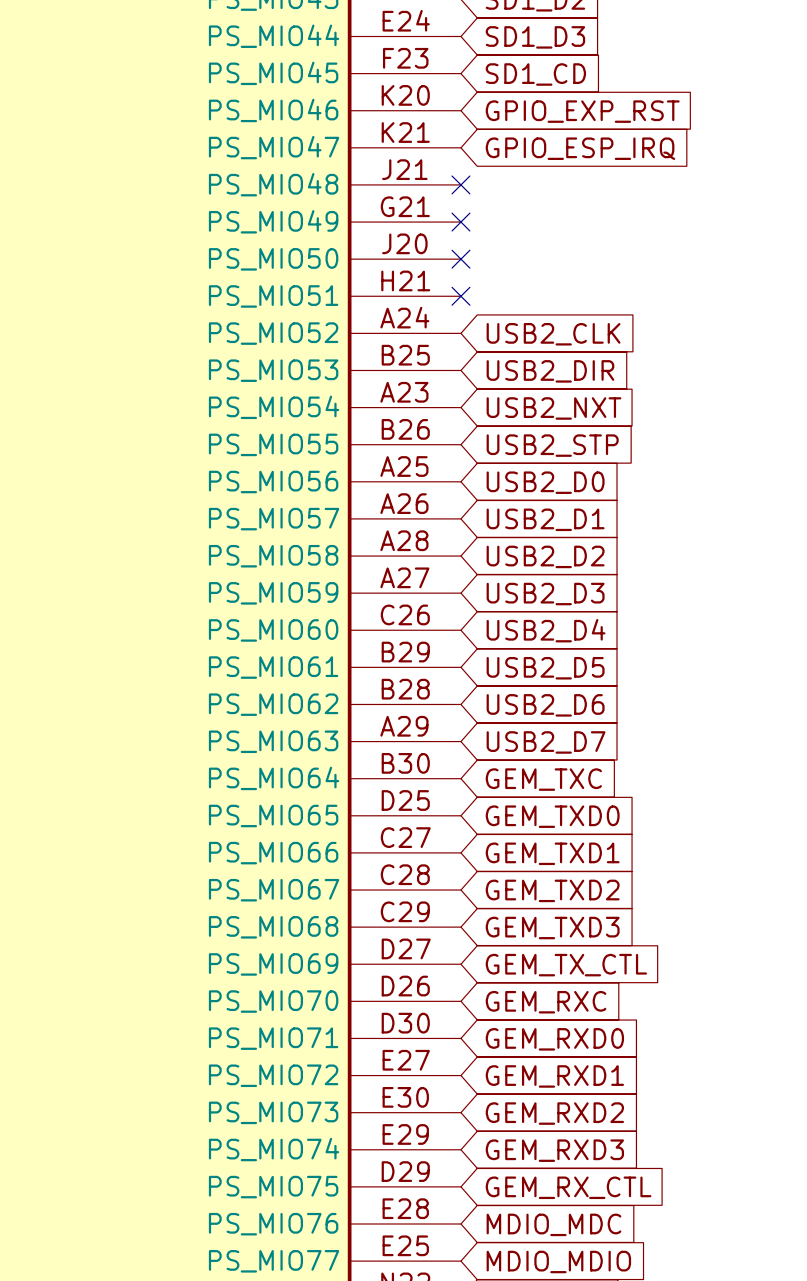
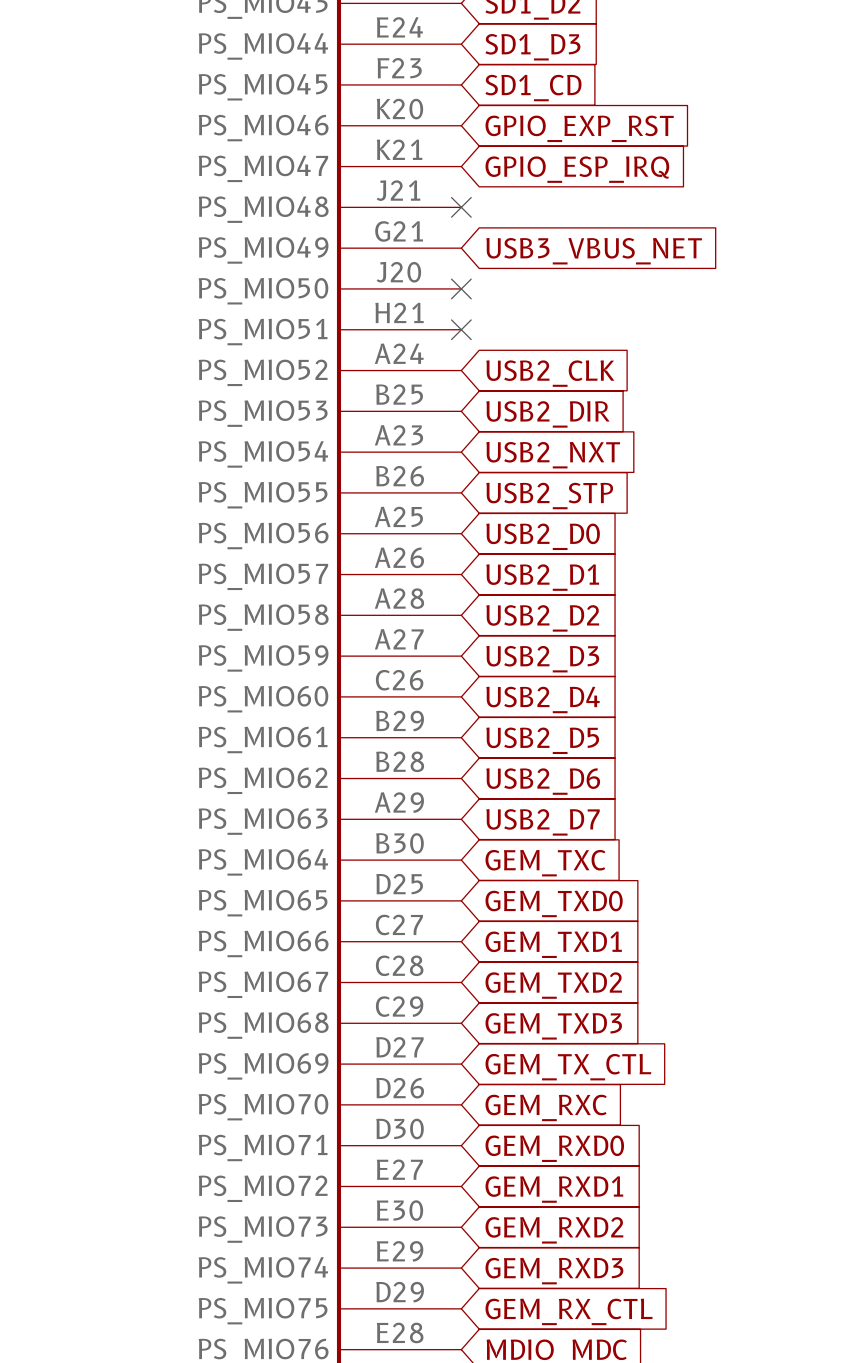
no-connect mark: (460, 222) -> none
global label: none -> USB3_VBUS_NET (594, 251)

